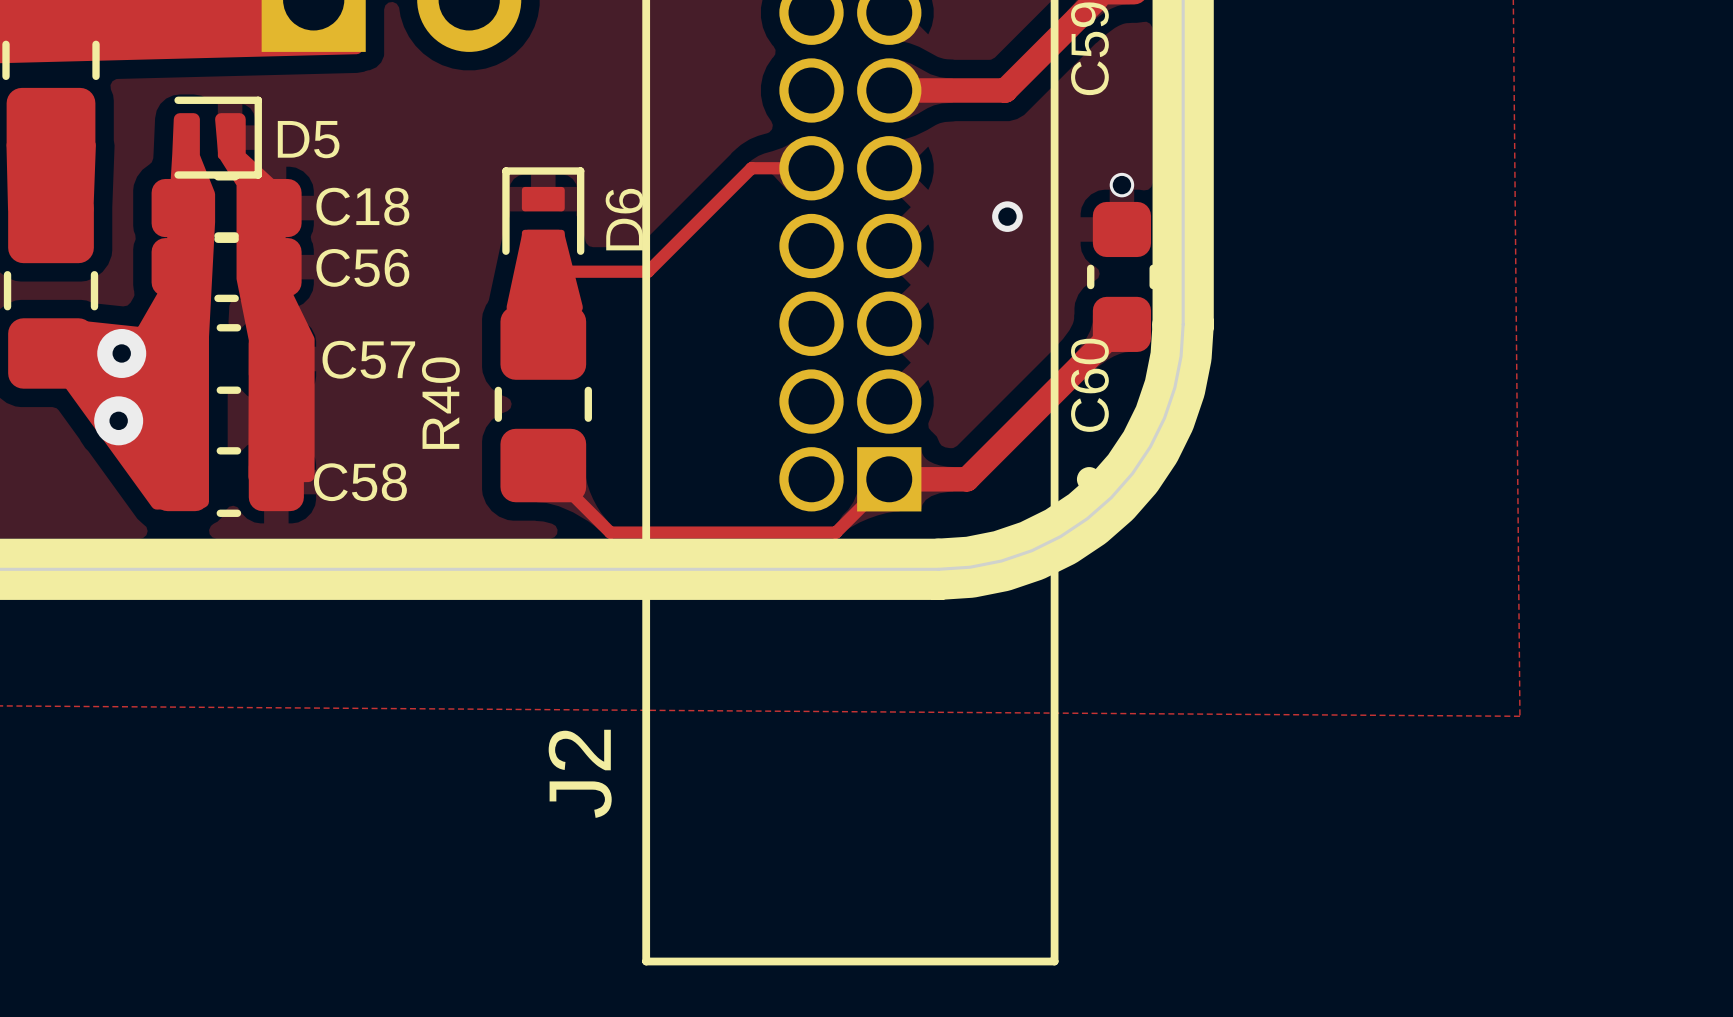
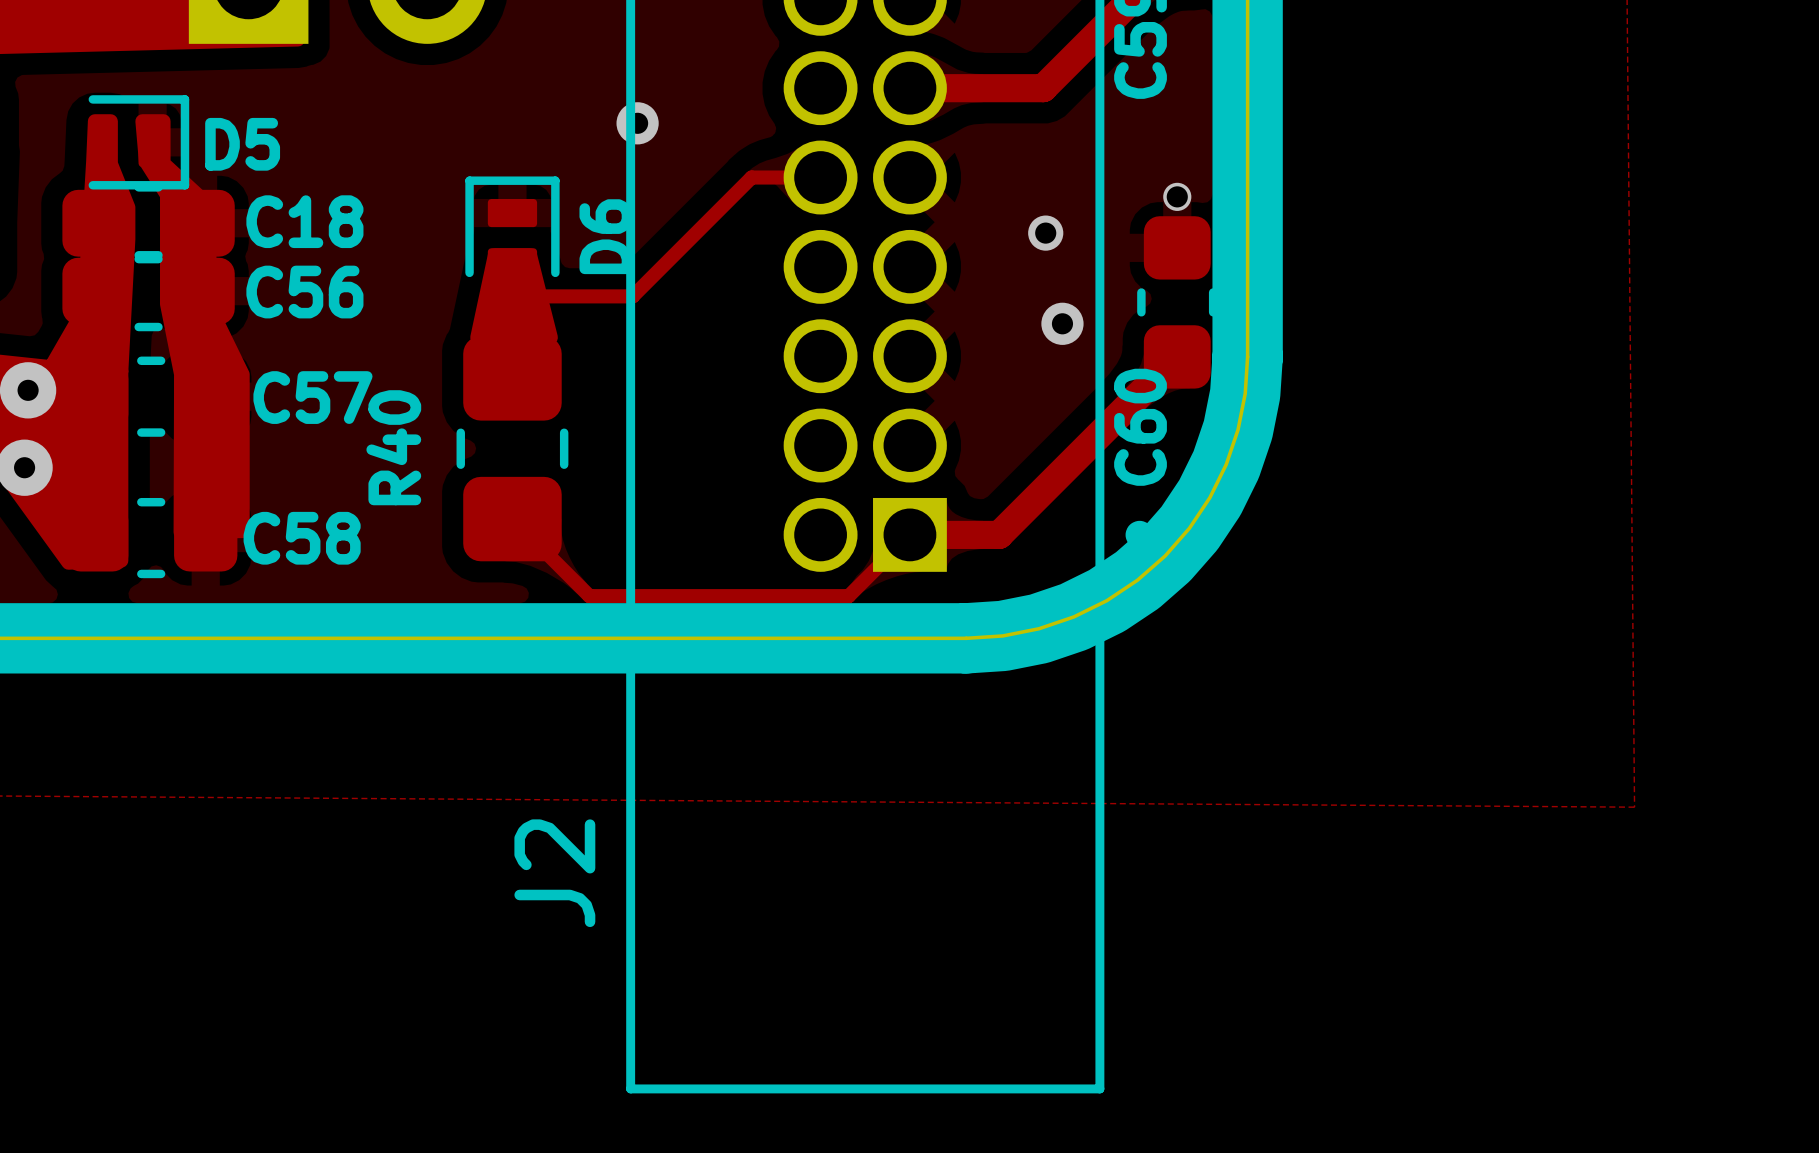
via: none -> (637, 123)
via: none -> (1062, 323)

